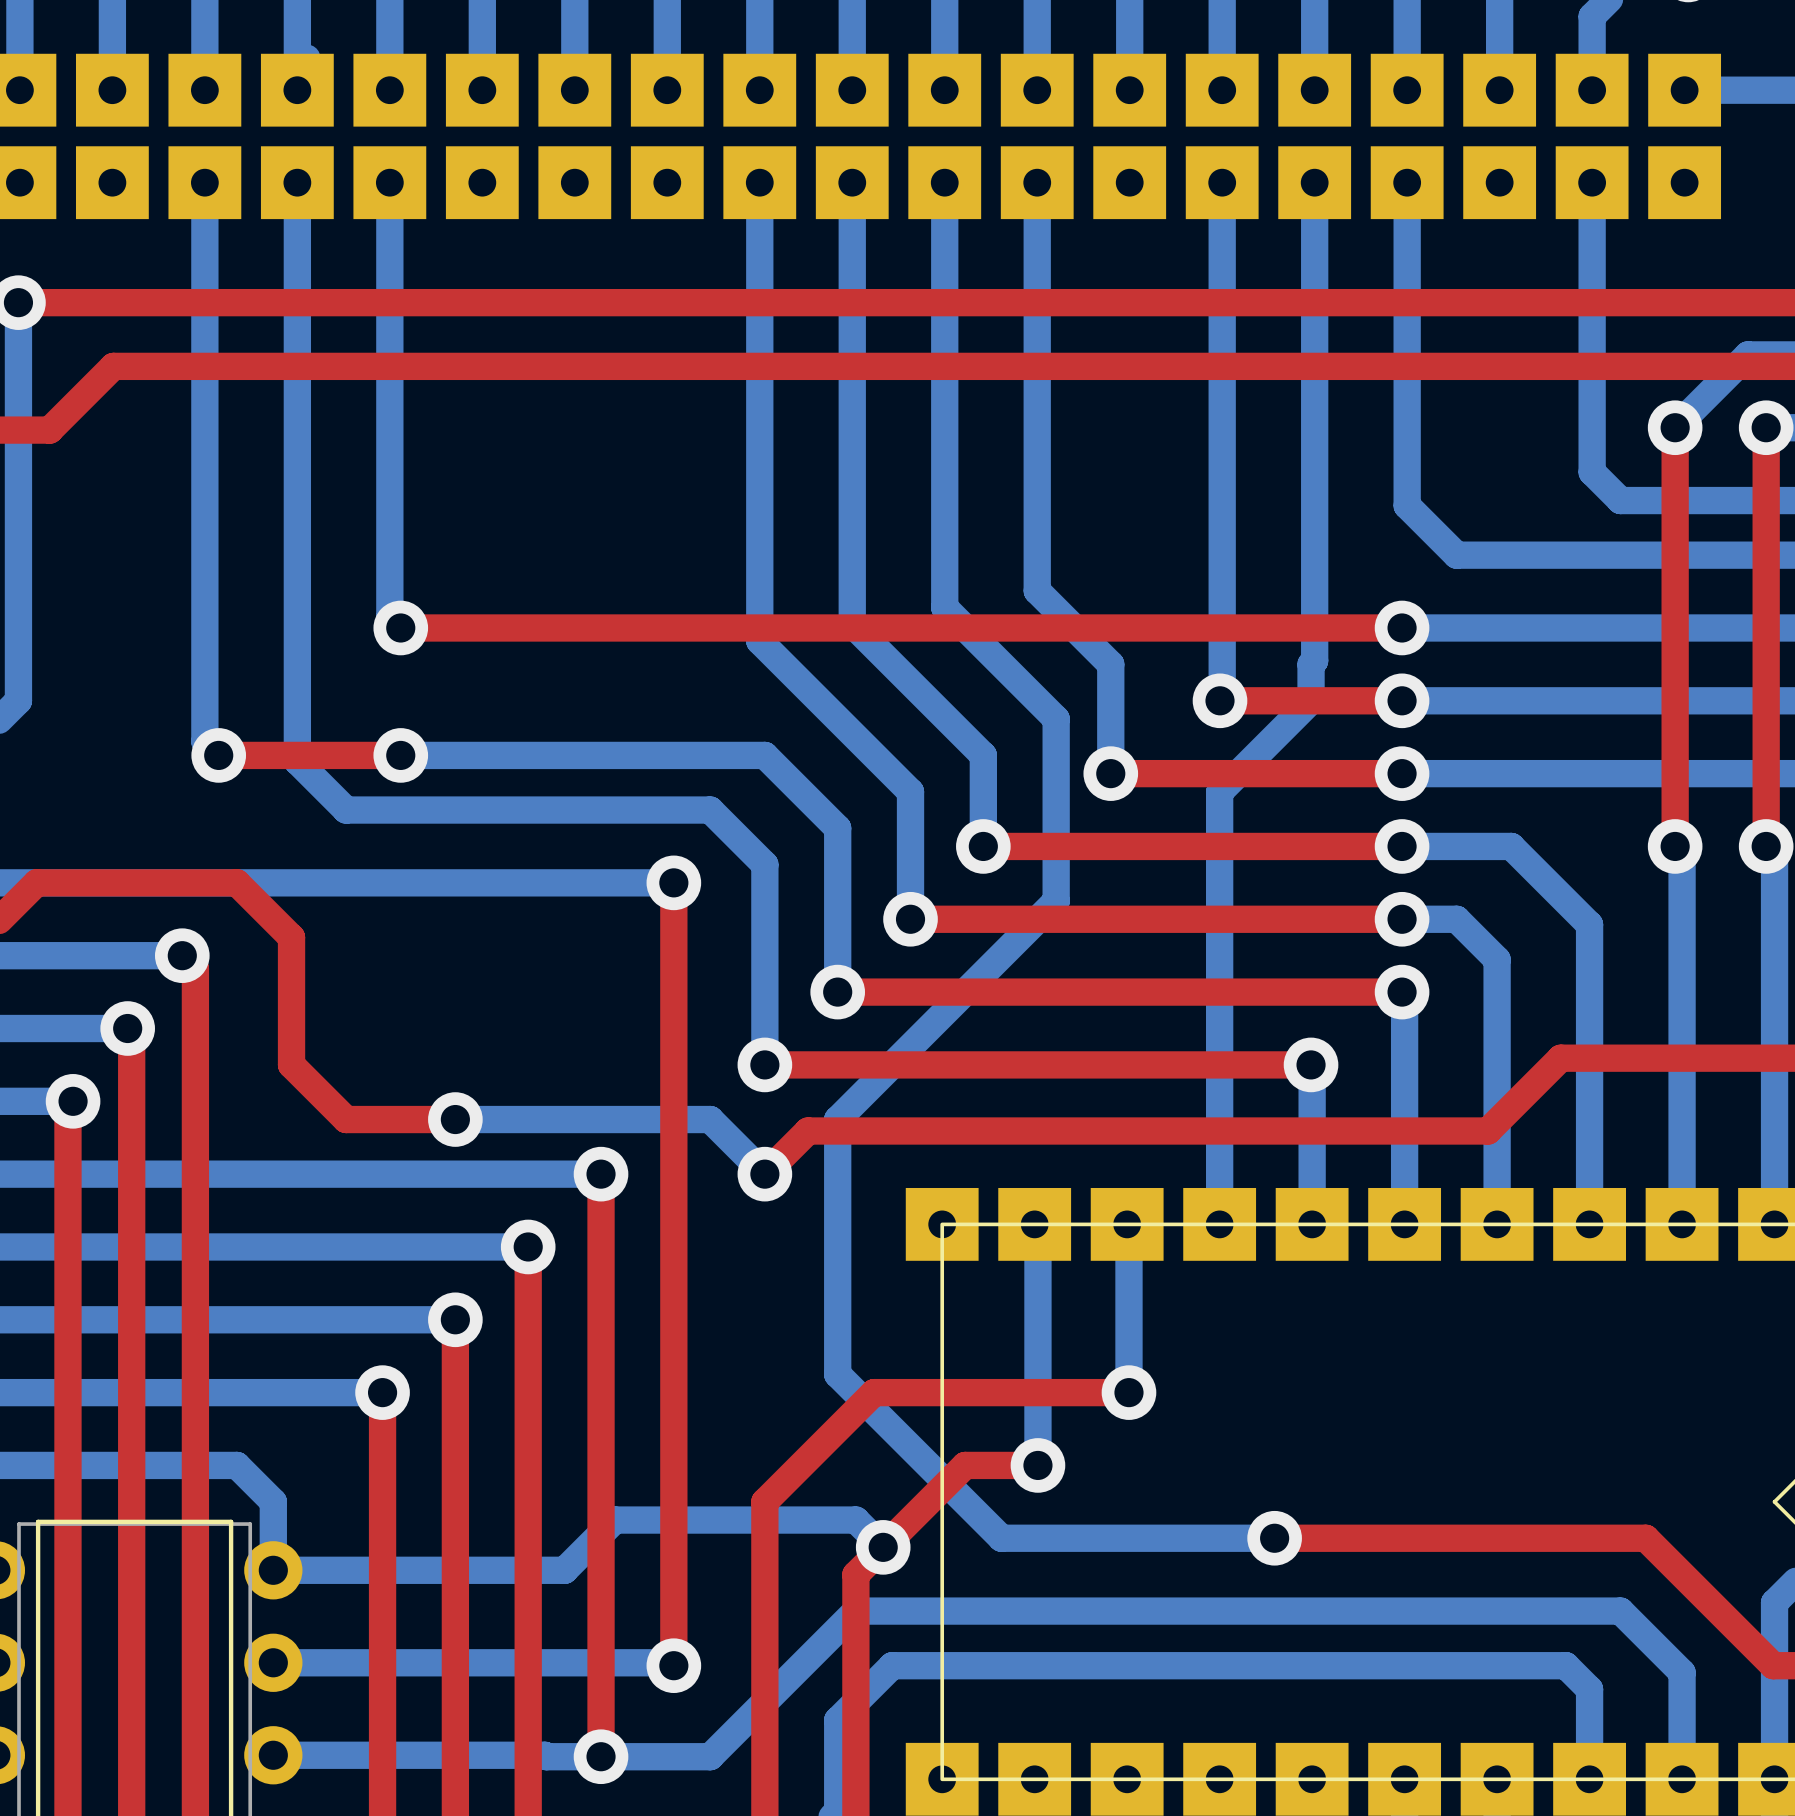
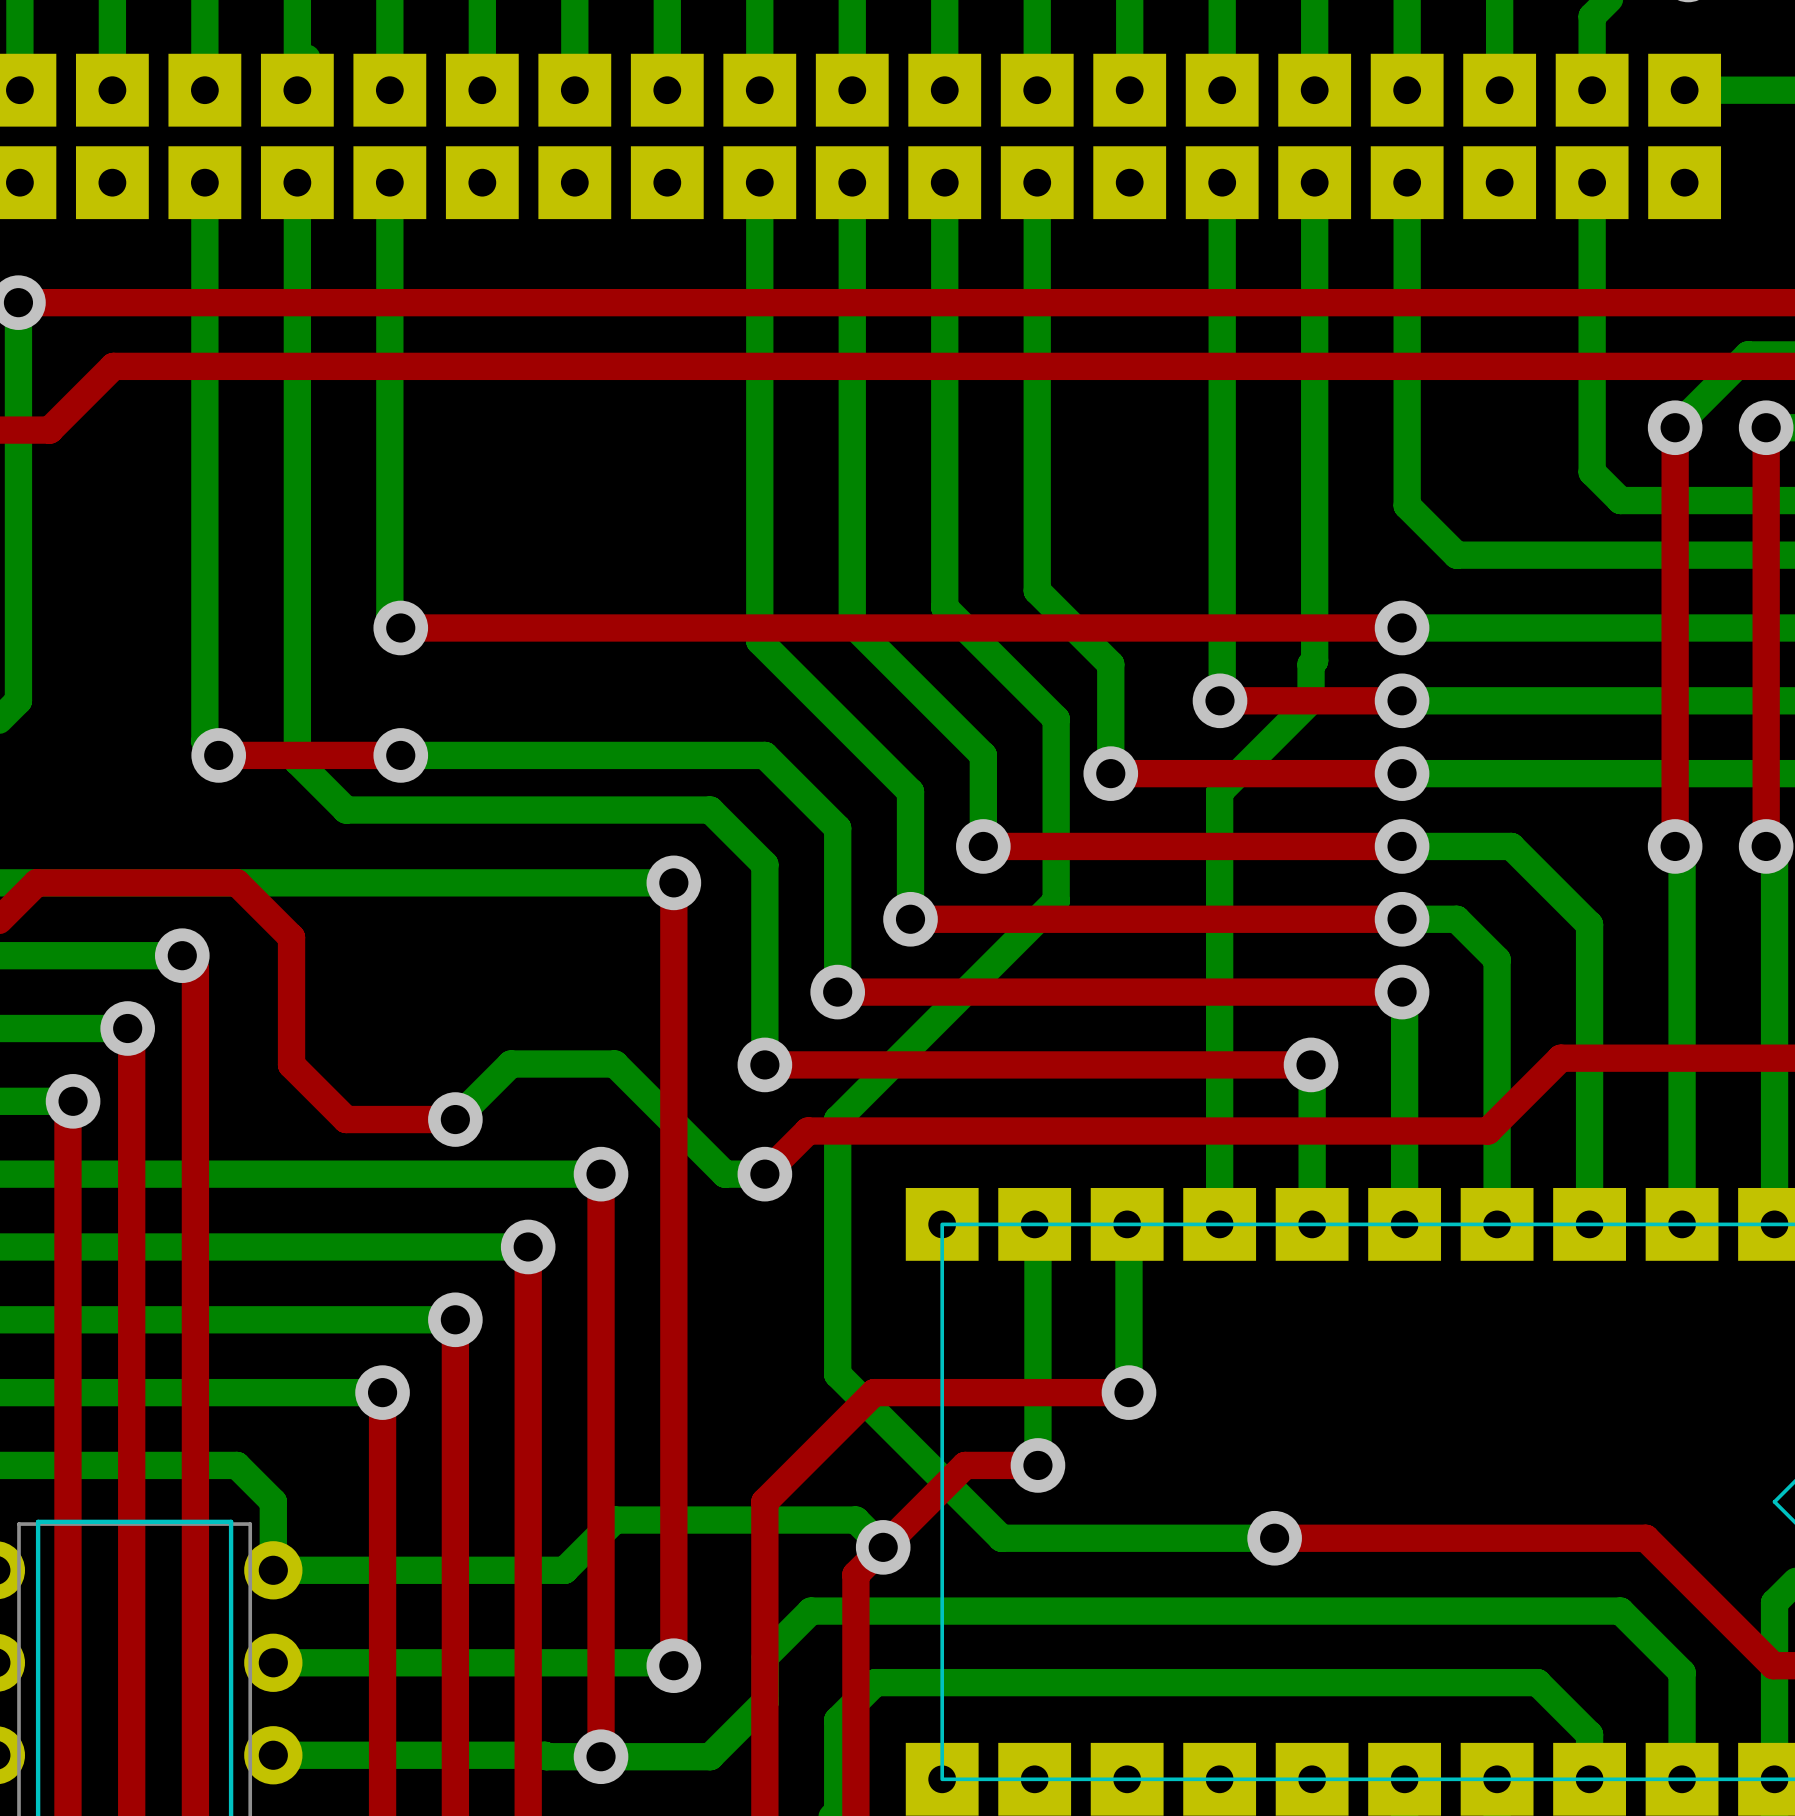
bottom track: (455, 1119) (710, 1119) (764, 1174) -> (455, 1119) (510, 1064) (614, 1064) (725, 1174) (764, 1174)
bottom track: (855, 1611) (765, 1701) -> (855, 1611) (810, 1611) (765, 1656) (765, 1701)
bottom track: (875, 1682) (892, 1665) (1565, 1665) (1589, 1689) (1589, 1734) -> (875, 1682) (1537, 1682) (1589, 1734)

